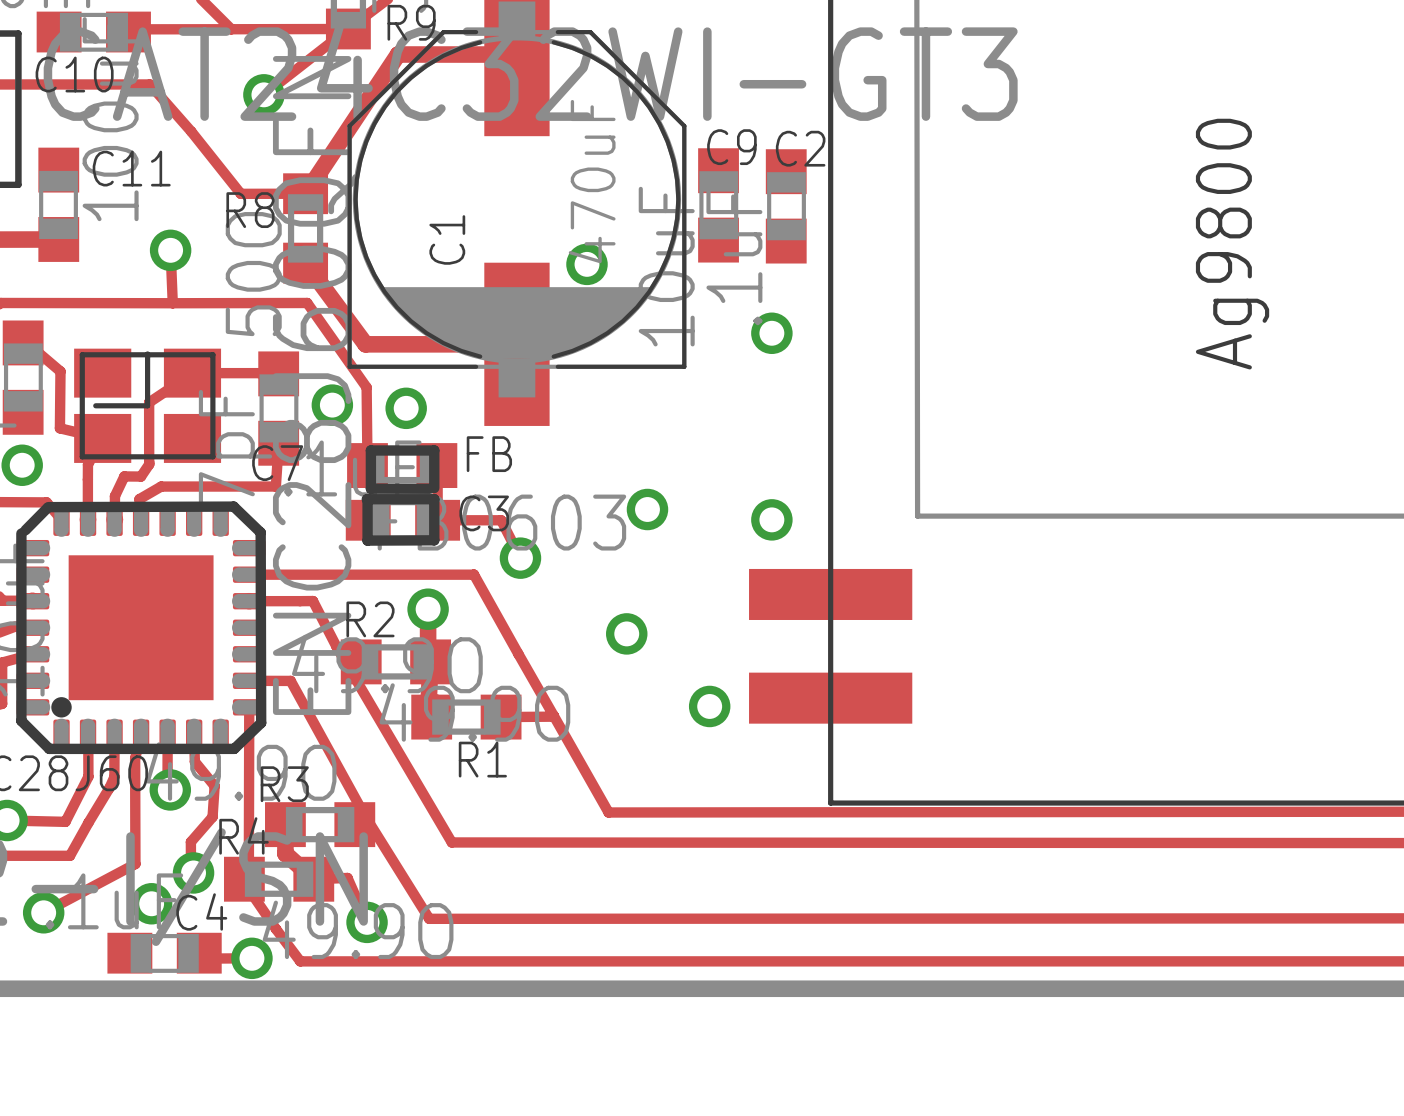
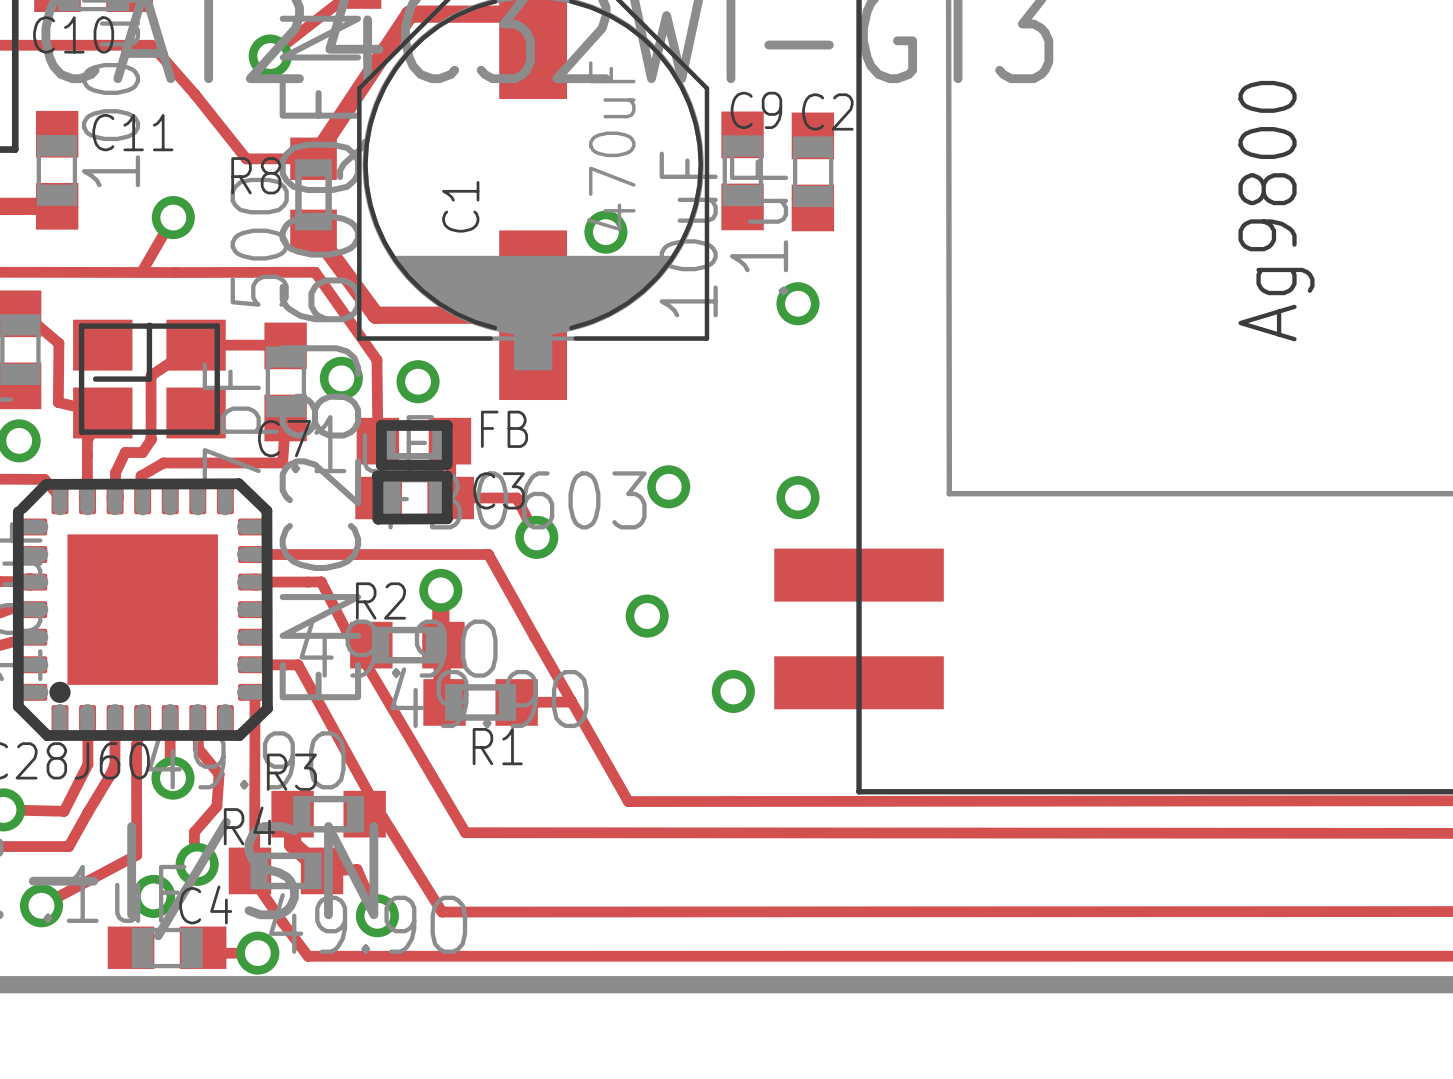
track: (170, 250) (172, 303) -> (173, 217) (142, 271)

